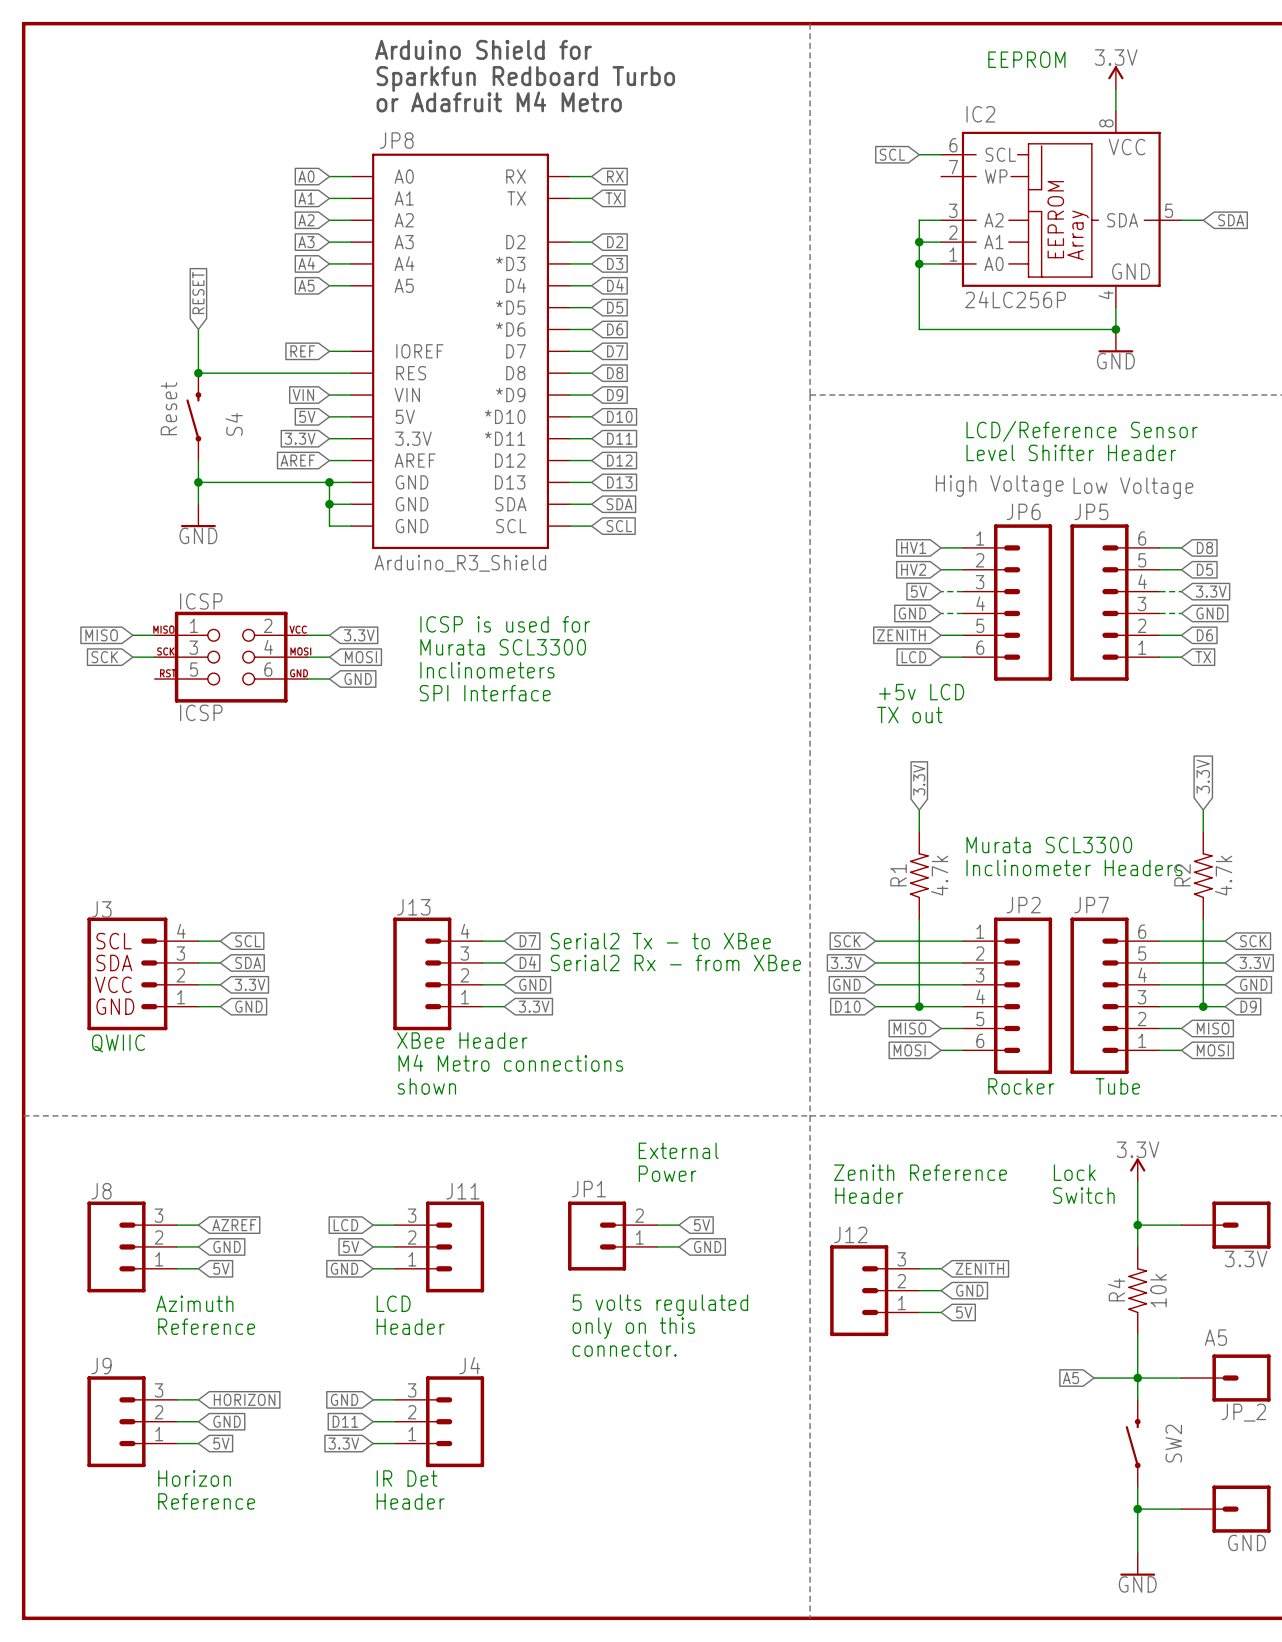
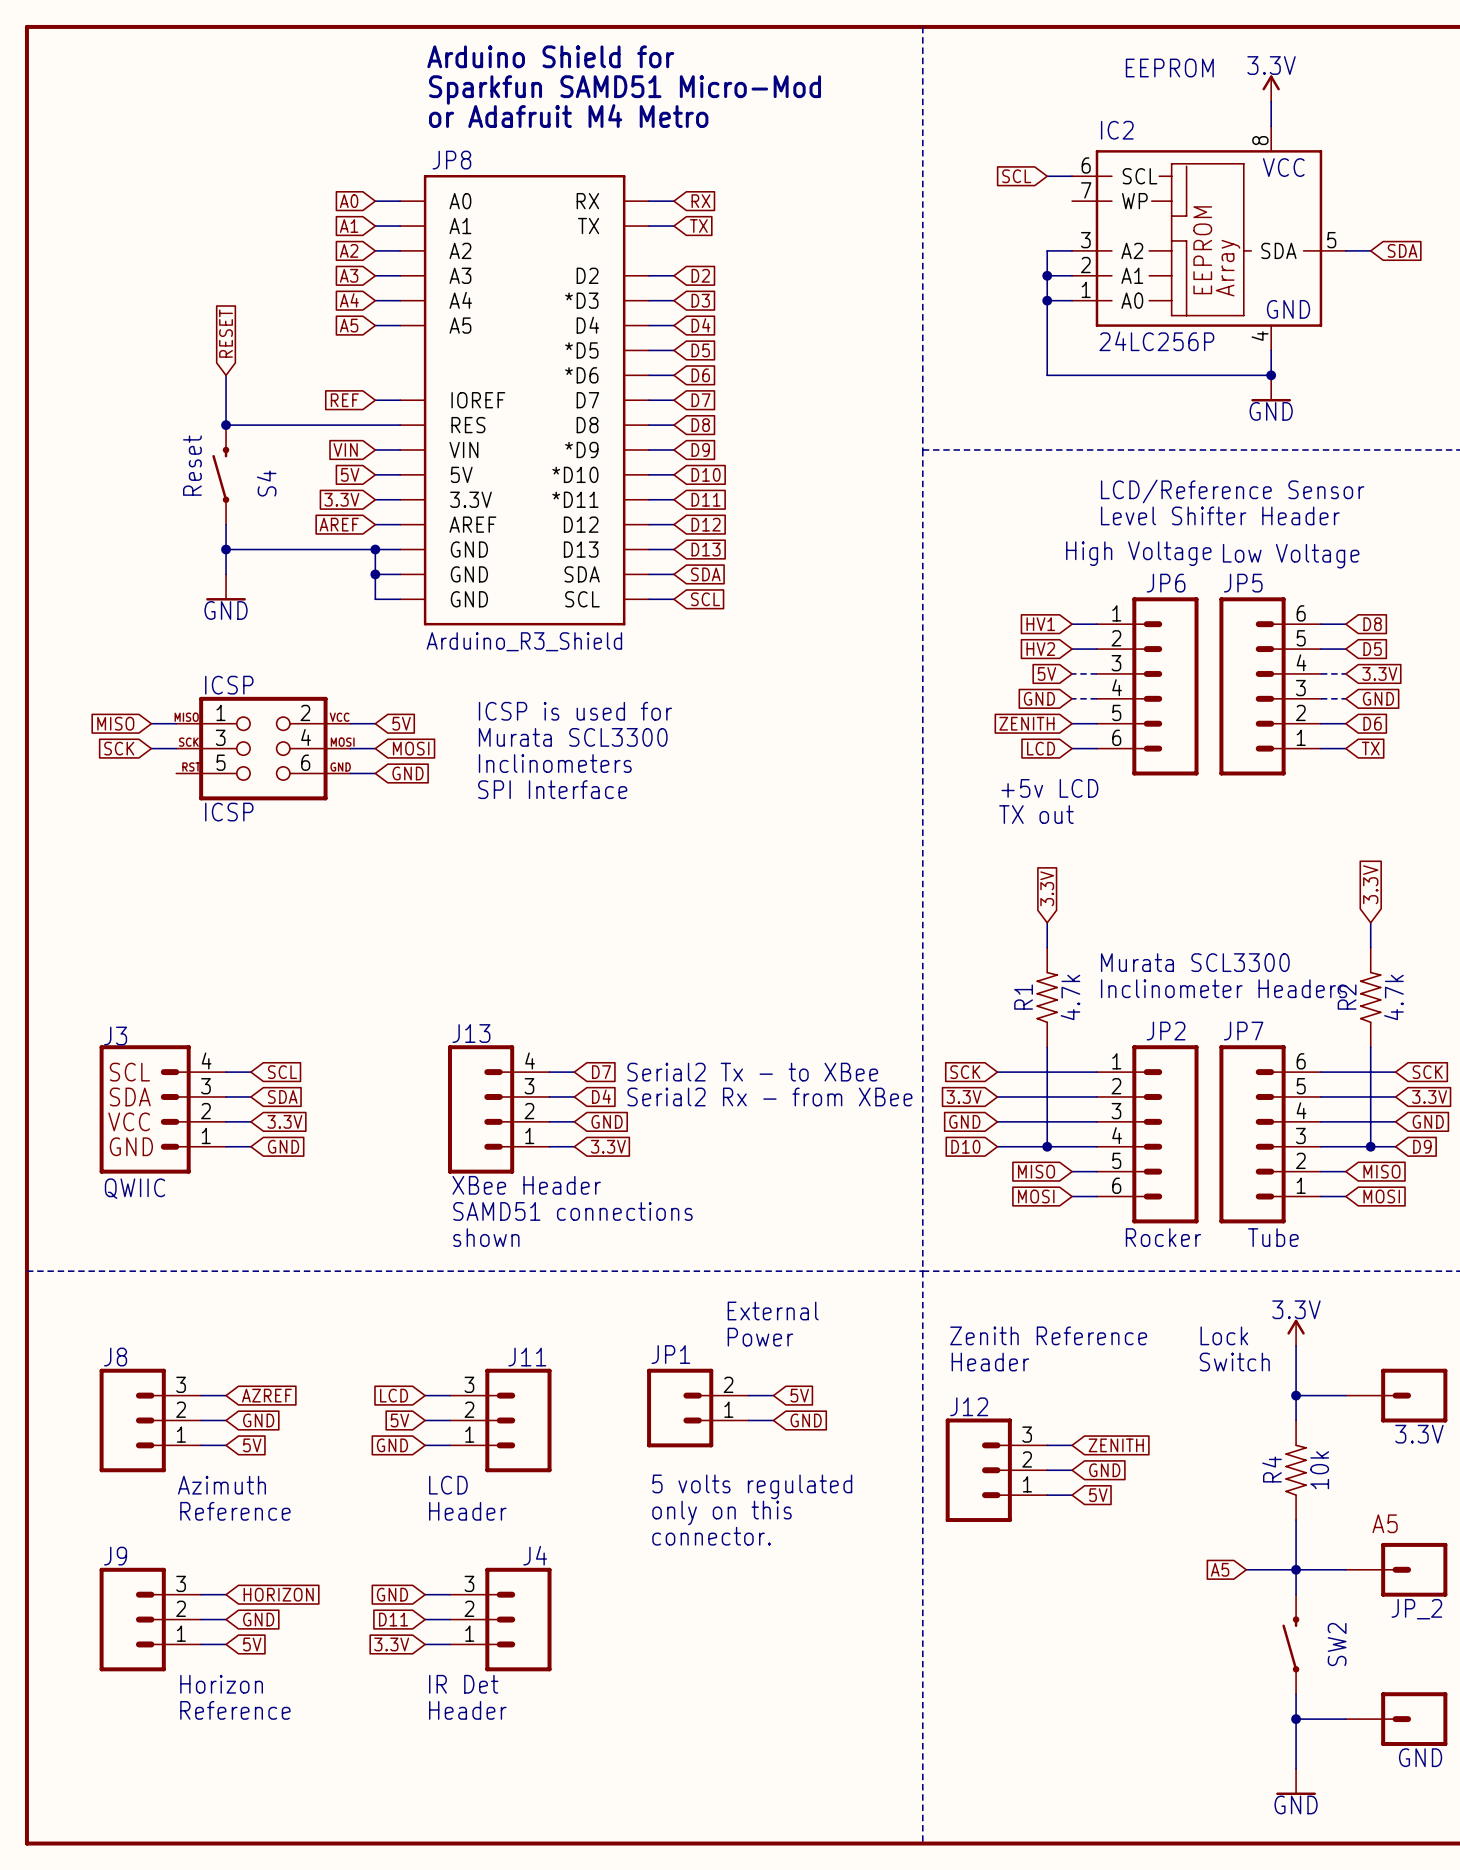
text: Sparkfun Redboard Turbo (525, 78) -> Sparkfun SAMD51 Micro-Mod (625, 89)
global label: 3.3V (359, 635) -> 5V (401, 723)
text: M4 Metro connections (510, 1063) -> SAMD51 connections (572, 1211)

